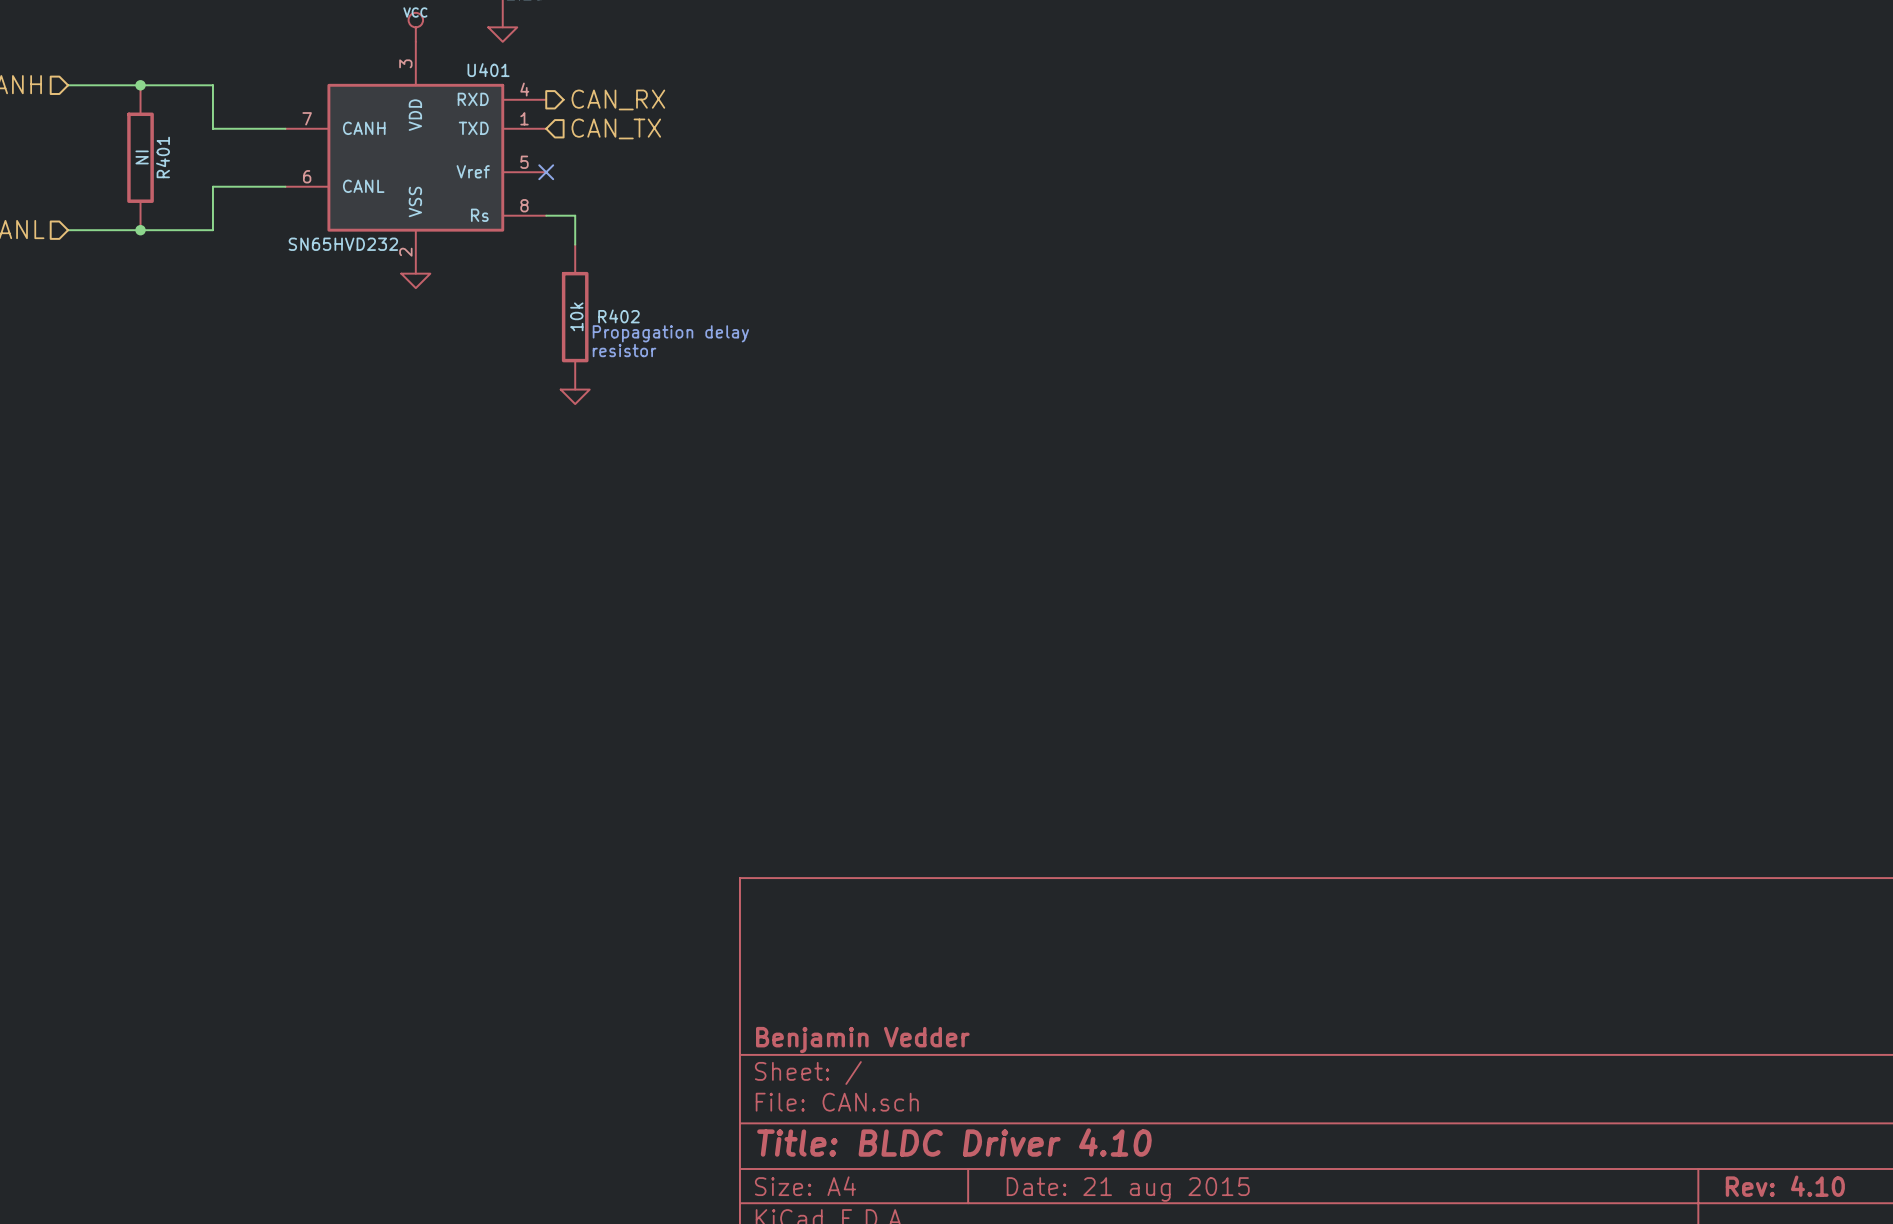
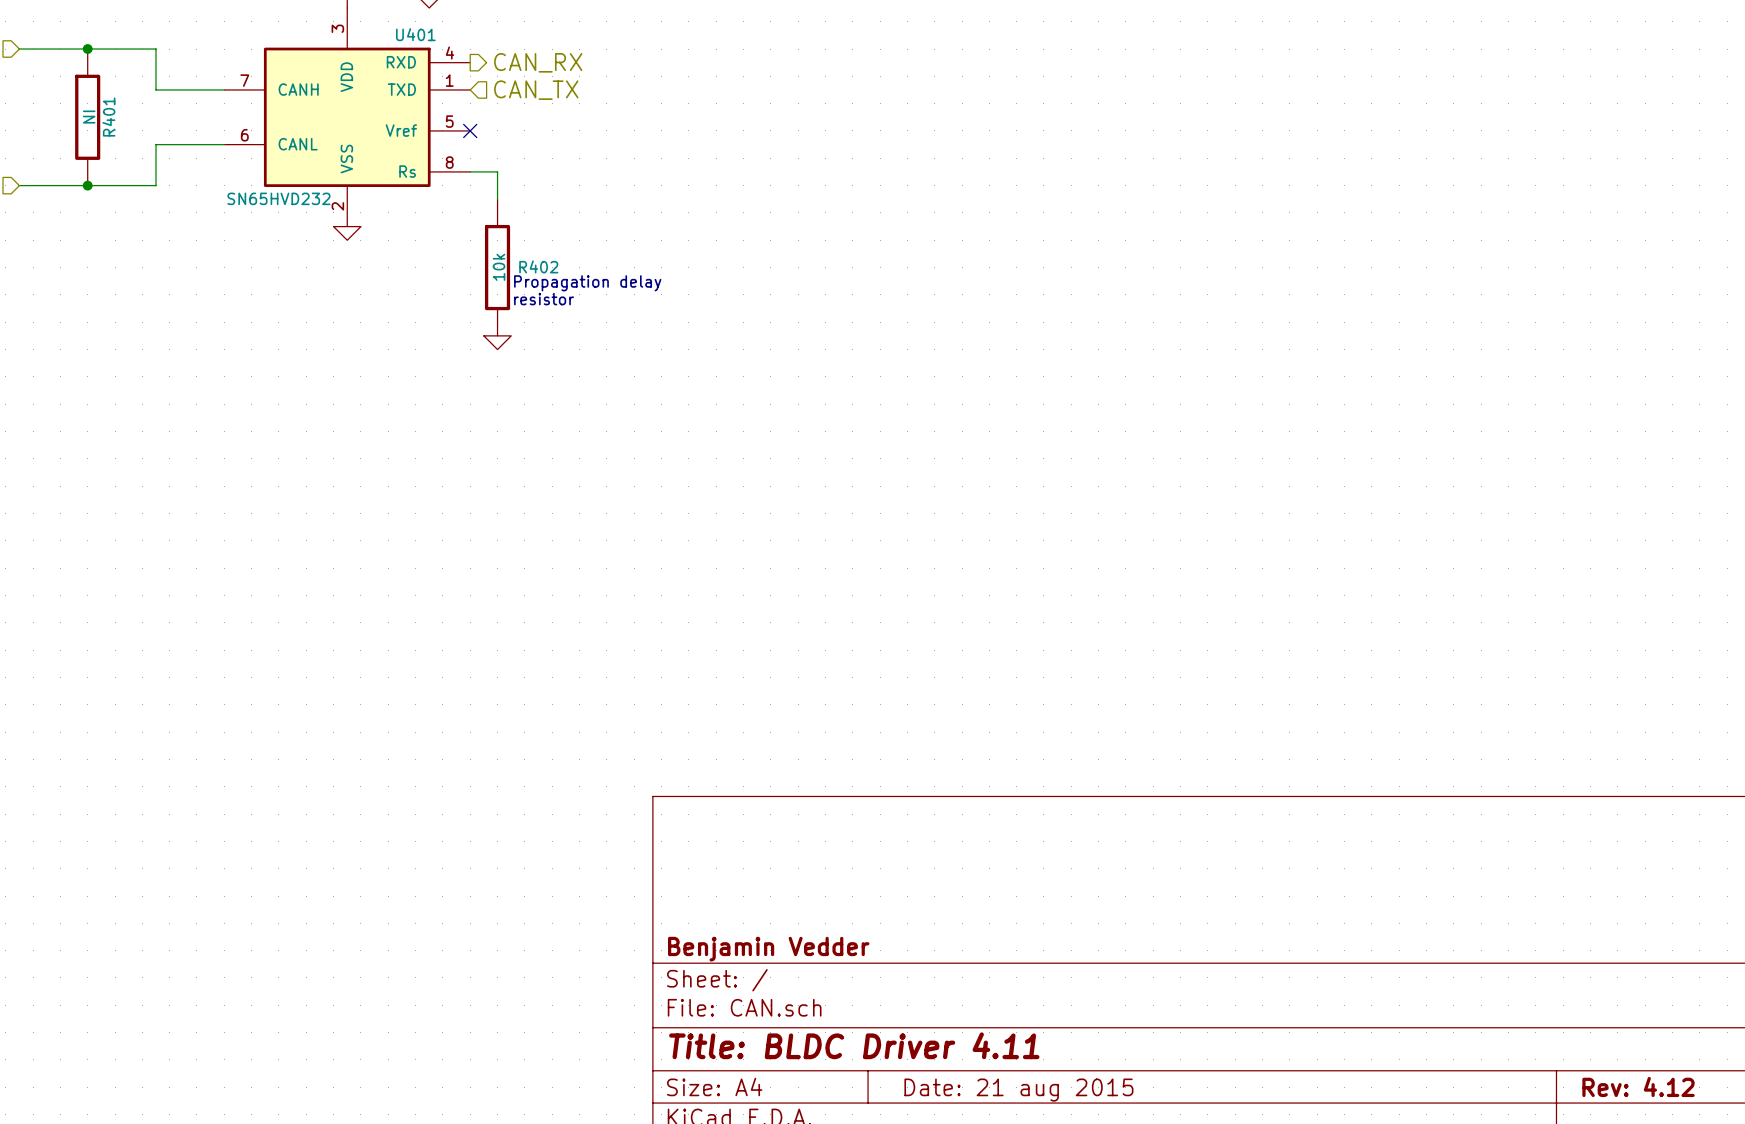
title block: Title: BLDC Driver 4.10 (954, 1142) -> Title: BLDC Driver 4.11 (854, 1045)
title block: Rev: 4.10 (1785, 1186) -> Rev: 4.12 (1638, 1086)

